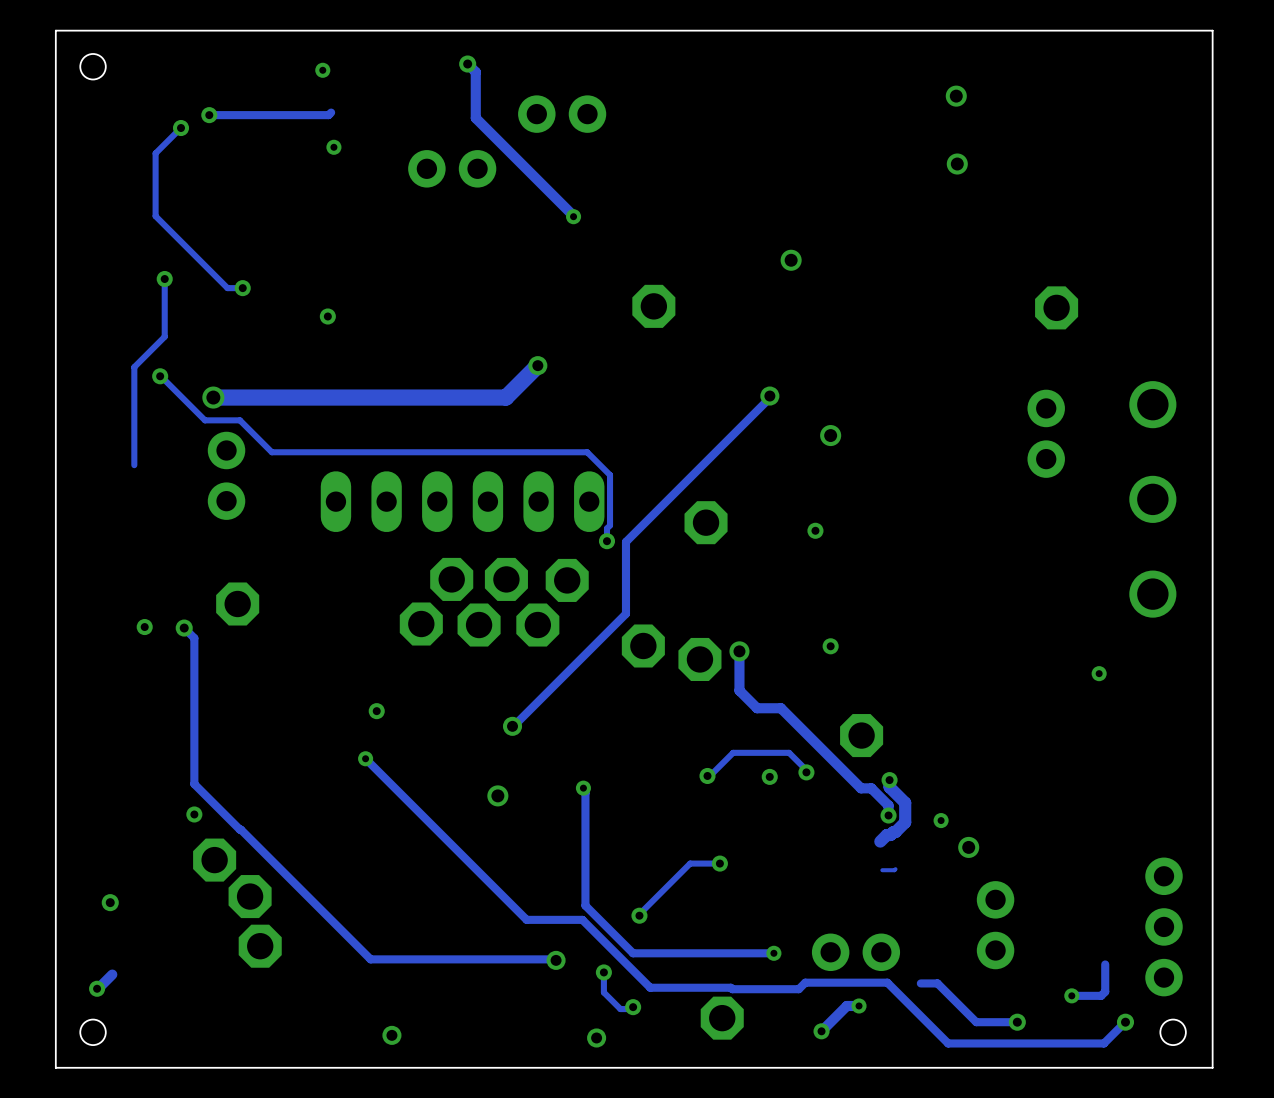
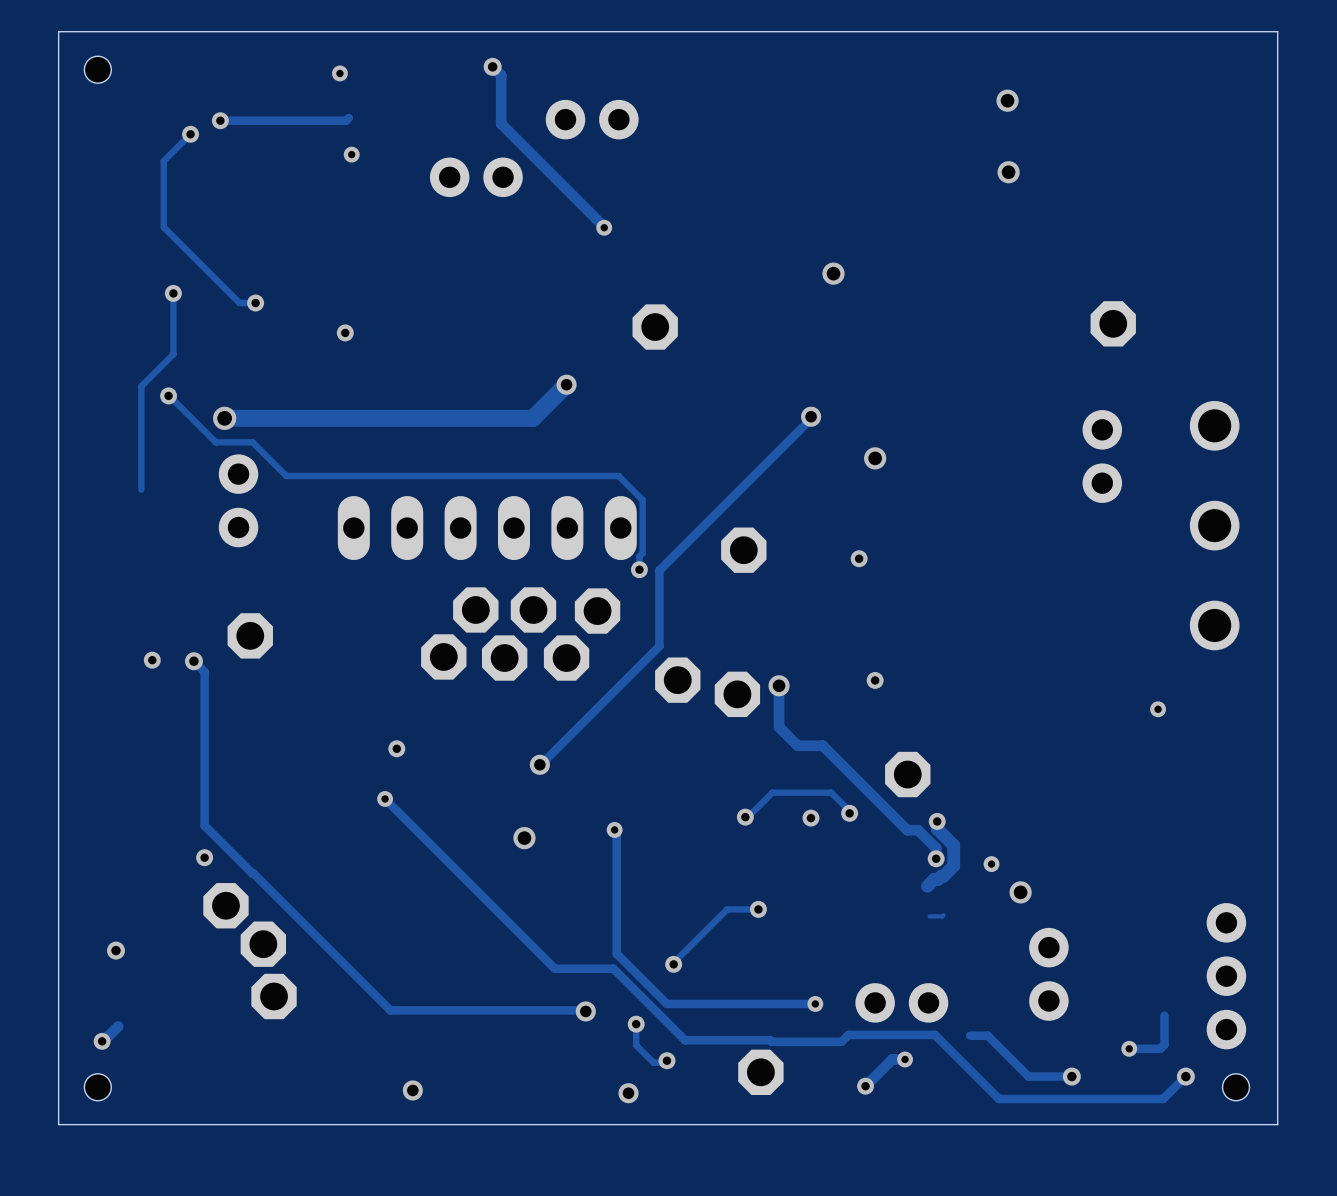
part position: (653, 306) -> (655, 327)

